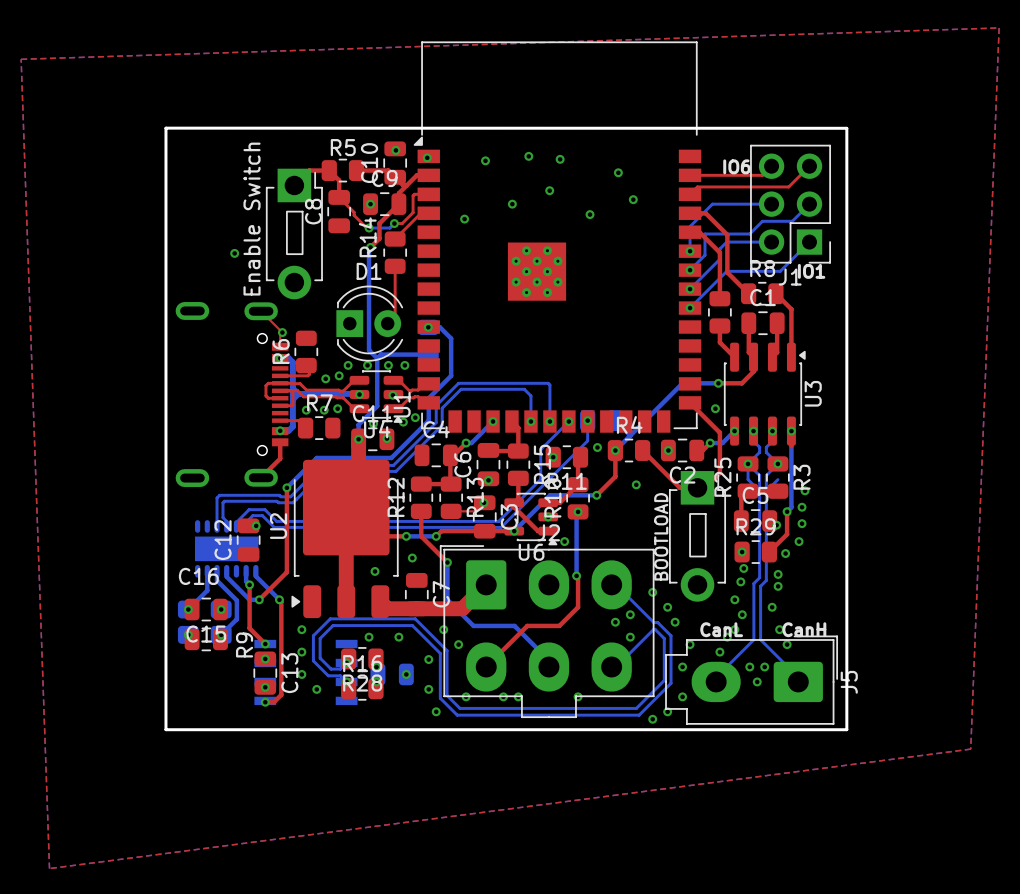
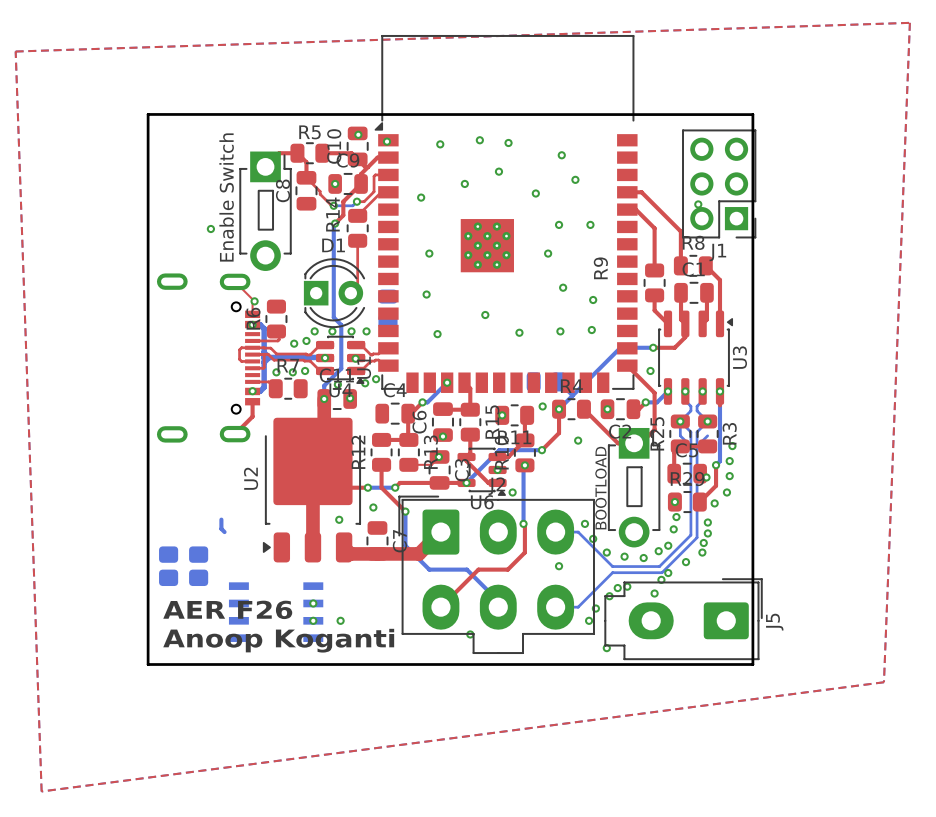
board edge: (165, 128) (846, 128) (846, 729) (827, 729) -> (148, 114) (752, 114) (752, 664)
text: IO6 (736, 166) -> none
top track: (771, 166) (762, 175) (690, 175) -> none
top track: (809, 166) (788, 186) (697, 186) (690, 194) -> none
bottom track: (771, 204) (712, 204) (690, 226) (690, 251) -> none
bottom track: (809, 204) (792, 221) (762, 221) (749, 234) (704, 234) (704, 255) (690, 270) -> none
via: none -> (698, 204)
top track: (727, 234) (727, 272) (748, 293) -> (661, 212) (680, 231) (680, 265)
bottom track: (771, 242) (726, 242) (719, 248) (719, 259) (690, 289) -> none
bottom track: (809, 242) (780, 271) (726, 271) (690, 308) -> none
via: none -> (559, 224)
via: none -> (590, 224)
via: (690, 251) -> none
via: (690, 270) -> none
text: IO1 (811, 271) -> none
via: none -> (429, 253)
via: none -> (548, 253)
via: (690, 289) -> none
via: (690, 308) -> none
via: none -> (563, 287)
via: none -> (426, 294)
bottom track: (428, 327) (439, 327) (451, 338) (451, 375) (428, 398) (428, 420) (391, 457) (316, 457) (286, 487) -> none
via: (428, 327) -> none
via: none -> (593, 299)
via: none -> (485, 315)
bottom track: (428, 354) (381, 354) (377, 358) -> none
via: none -> (591, 330)
via: none -> (560, 331)
via: none -> (519, 332)
via: none -> (437, 334)
part: none -> (340, 358)
bottom track: (587, 420) (587, 440) (501, 527) (274, 527) (262, 515) (252, 515) (246, 522) (246, 526) -> none
via: (587, 420) -> none
bottom track: (530, 421) (530, 395) (524, 389) (461, 389) (442, 408) (442, 425) (395, 471) (324, 471) (293, 502) (224, 501) (222, 517) (226, 521) (226, 526) -> none
via: (530, 421) -> none
bottom track: (549, 421) (549, 385) (548, 383) (458, 383) (436, 405) (436, 422) (393, 465) (321, 465) (290, 496) (219, 495) (217, 498) (217, 526) -> none
via: (549, 421) -> none
bottom track: (568, 421) (540, 449) (540, 479) (498, 521) (276, 521) (264, 509) (249, 509) (236, 522) (236, 526) -> none
via: (568, 421) -> none
top track: (286, 487) (286, 572) (259, 599) -> none
via: (286, 487) -> none
via: (256, 525) -> none
C12: (248, 540) -> none
part: (226, 548) -> none
bottom track: (207, 571) (207, 590) (188, 609) -> none
bottom track: (217, 571) (217, 580) (236, 600) (236, 619) (221, 634) -> none
bottom track: (226, 571) (226, 576) (249, 599) (259, 599) -> none
bottom track: (255, 571) (255, 576) (279, 599) -> none
via: none -> (584, 523)
bottom track: (759, 577) (753, 583) (753, 639) (716, 677) (716, 681) -> (690, 525) (690, 535) (659, 566) (612, 566) (578, 532) (559, 532)
bottom track: (766, 580) (760, 586) (760, 639) (798, 677) (798, 681) -> (697, 528) (697, 537) (662, 572) (612, 572) (578, 607) (559, 607)
top track: (249, 584) (249, 628) (265, 644) -> none
via: (249, 584) -> none
bottom track: (616, 584) (653, 622) (657, 622) (671, 635) (671, 683) (639, 715) (457, 715) (440, 698) (440, 653) (412, 625) (333, 625) (320, 638) (320, 658) (331, 669) (340, 669) (346, 662) -> none
via: none -> (703, 543)
via: (259, 599) -> none
top track: (279, 599) (281, 601) (281, 694) (273, 702) (265, 702) -> none
via: (279, 599) -> none
via: none -> (658, 551)
via: (188, 609) -> none
C15: (206, 609) -> none
via: (221, 609) -> none
via: none -> (624, 556)
via: none -> (643, 558)
via: (630, 614) -> none
via: (742, 614) -> none
via: none -> (686, 562)
via: (675, 622) -> none
via: (301, 629) -> none
via: (443, 629) -> none
text: CanL (721, 629) -> none
via: (779, 629) -> none
text: CanH (804, 629) -> none
via: (188, 634) -> none
via: (221, 634) -> none
via: (369, 637) -> none
via: (398, 637) -> none
via: (630, 637) -> none
C16: (206, 639) -> none
via: (265, 644) -> none
via: (458, 644) -> none
via: (787, 644) -> none
R9 name position: R9 (244, 645) -> R9 (600, 268)
via: none -> (617, 588)
via: (301, 652) -> none
via: none -> (609, 596)
via: (265, 658) -> none
R28: (362, 658) -> none
via: (428, 659) -> none
via: (376, 667) -> none
bottom track: (616, 667) (653, 629) (664, 638) (664, 680) (636, 708) (460, 708) (447, 695) (447, 650) (415, 618) (330, 618) (313, 635) (313, 660) (328, 675) (340, 675) (346, 681) -> none
via: (682, 667) -> none
via: (749, 667) -> none
via: (764, 667) -> none
via: none -> (595, 608)
text: none -> AER F26 (227, 609)
C13: (265, 673) -> none
via: (301, 674) -> none
part: (392, 674) -> none
via: (406, 674) -> none
via: none -> (589, 620)
via: (757, 681) -> none
via: (265, 687) -> none
R16: (362, 688) -> none
via: (316, 689) -> none
via: (428, 689) -> none
via: (466, 696) -> none
via: (503, 696) -> none
via: (578, 696) -> none
via: (682, 696) -> none
via: (265, 702) -> none
text: none -> Anoop Koganti (278, 640)
via: (436, 711) -> none
via: (652, 719) -> none

